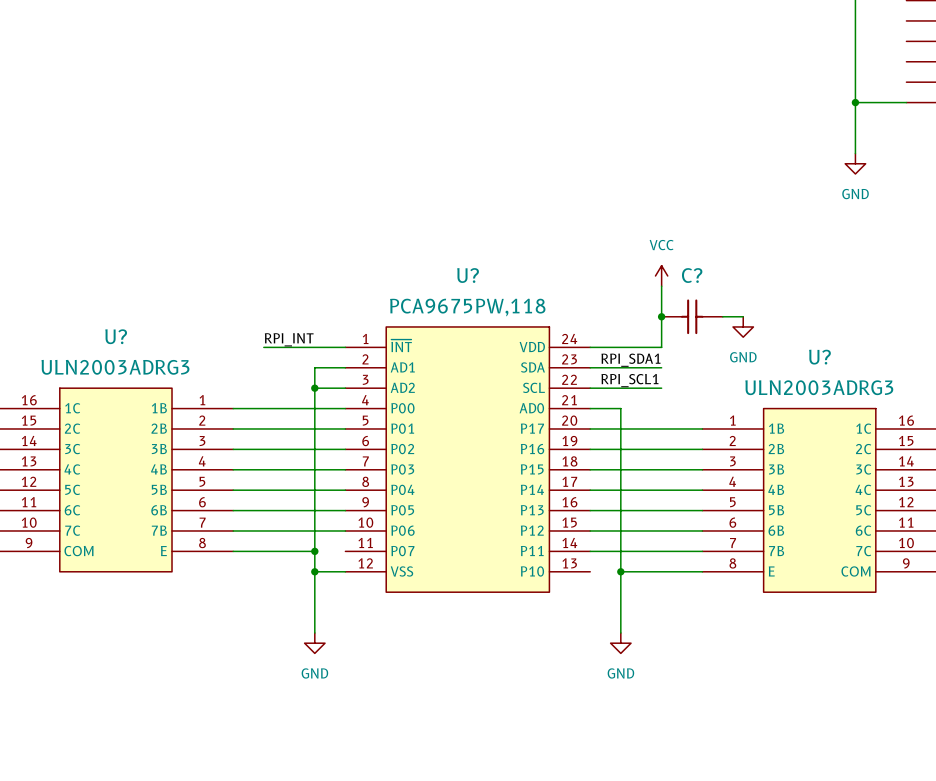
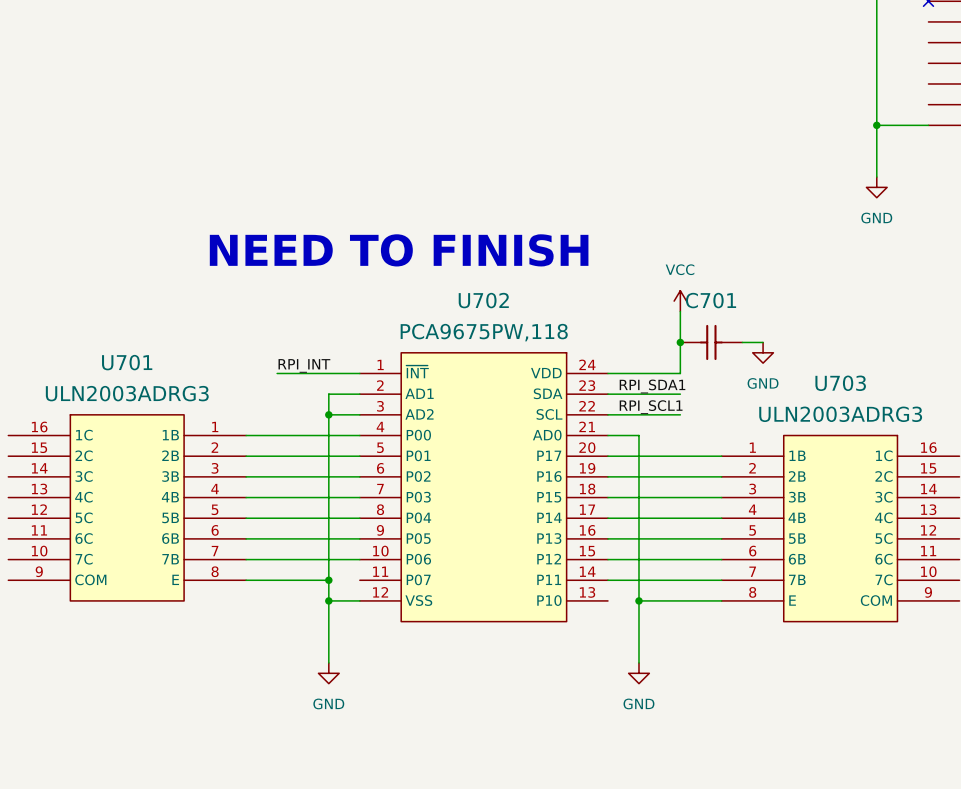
text: none -> NEED TO FINISH (399, 250)
U? name: U? (468, 275) -> U702 (483, 300)
C? name: C? (692, 275) -> C701 (710, 300)
U? name: U? (116, 336) -> U701 (127, 362)
U? name: U? (819, 357) -> U703 (840, 383)

